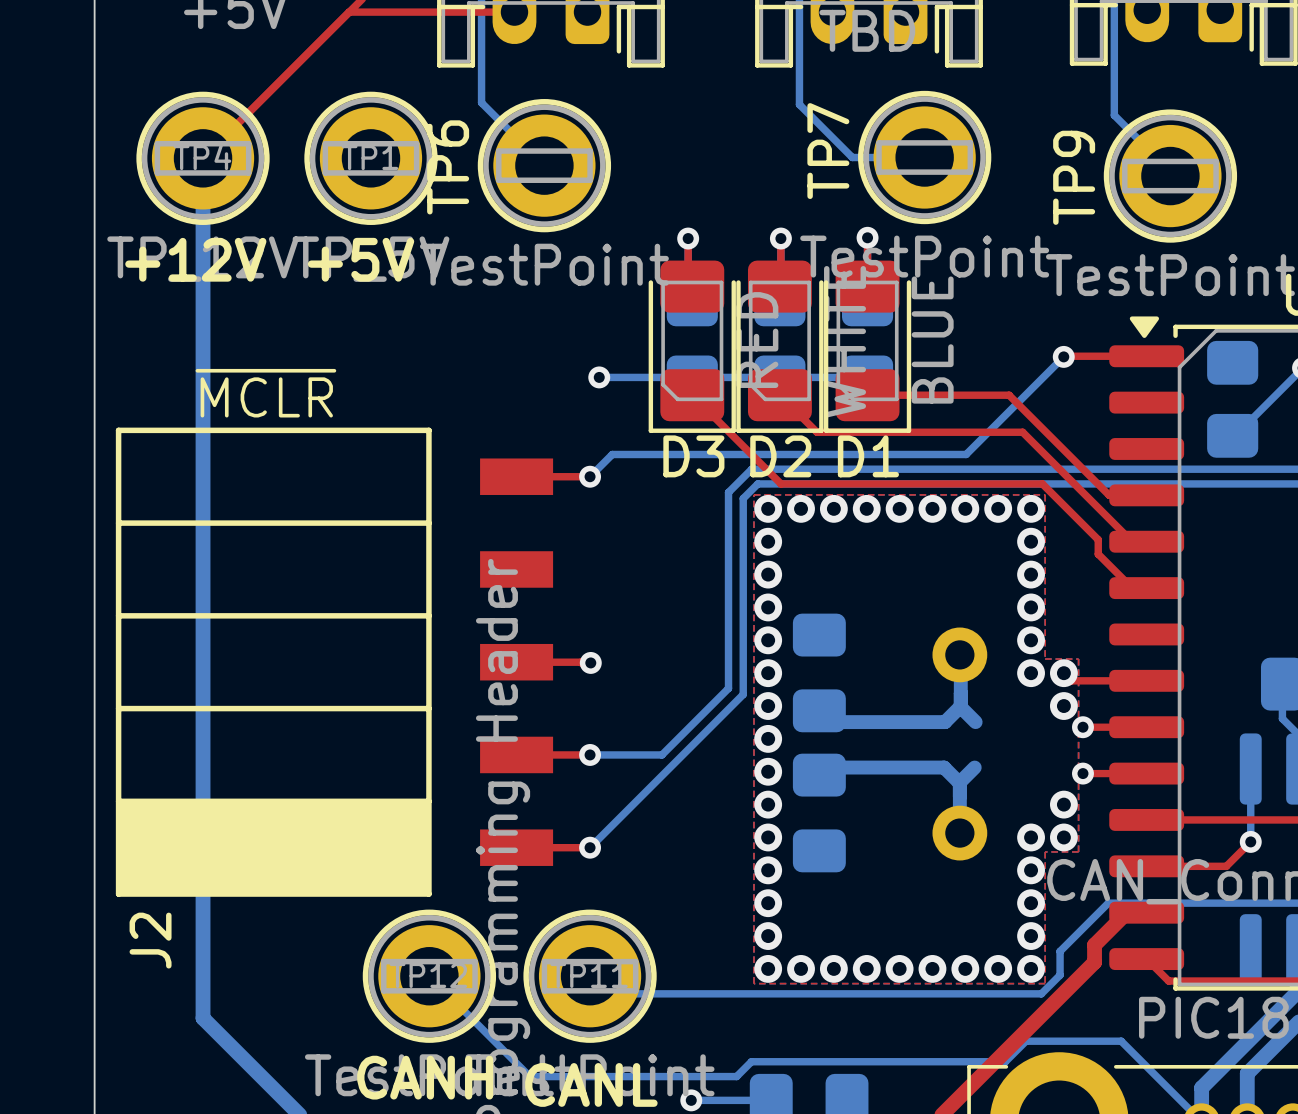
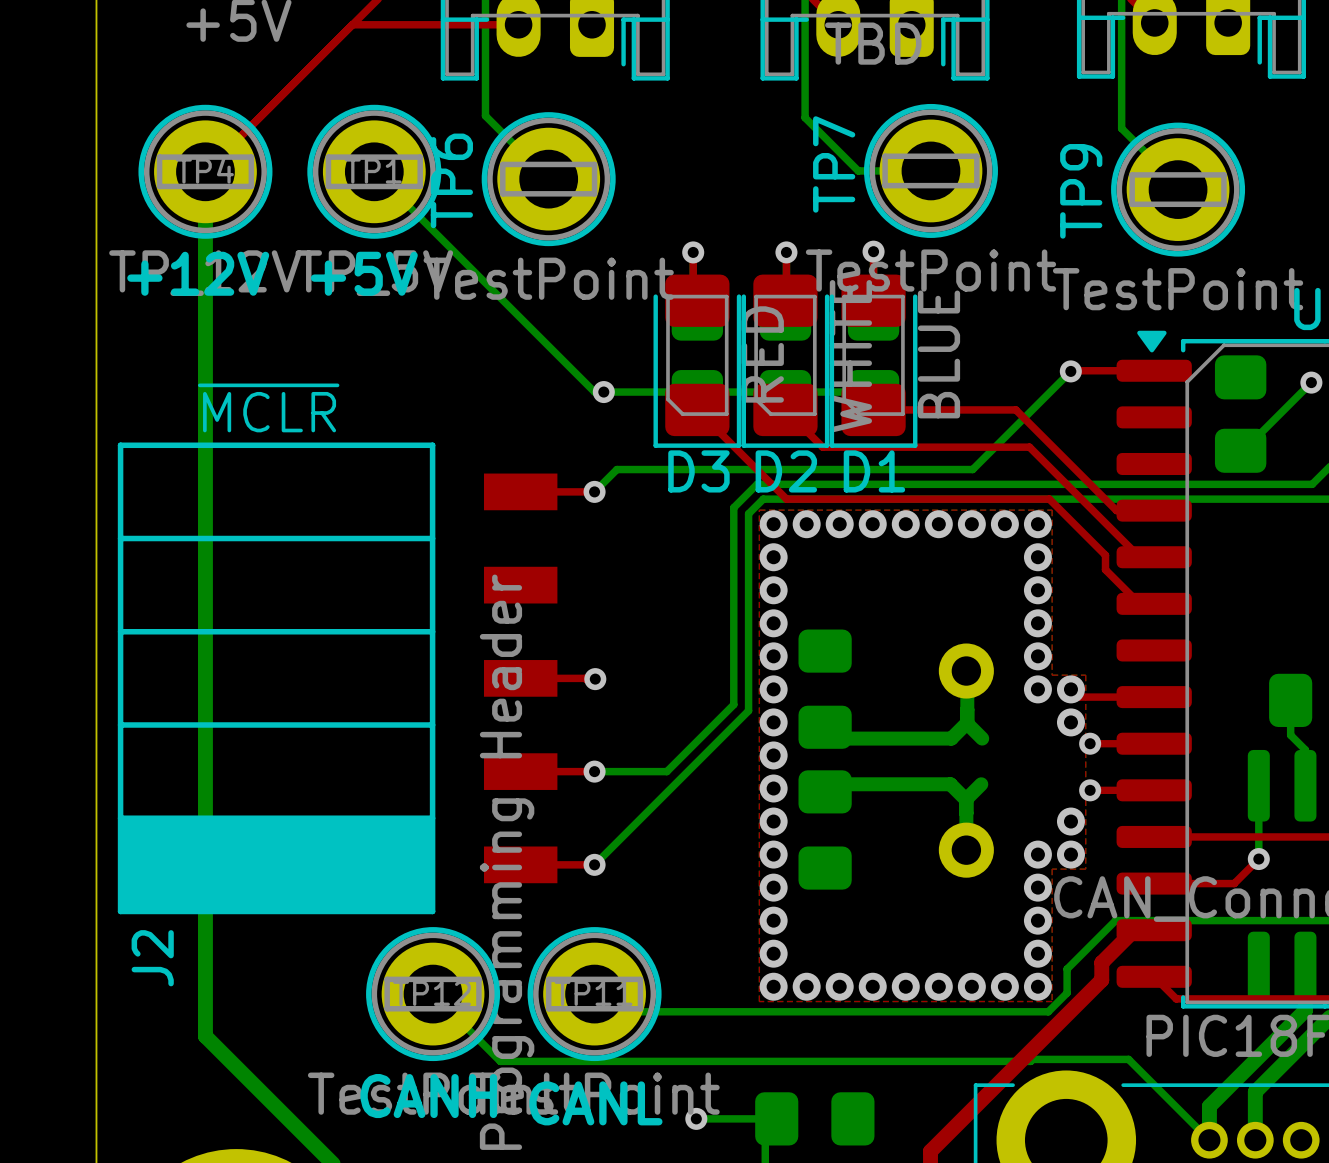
bottom track: none -> (374, 171) (594, 392) (603, 392)
bottom track: (496, 1043) (529, 1076) (736, 1076) (751, 1061) (1005, 1061) (1023, 1043) -> (500, 1061) (1030, 1061)

